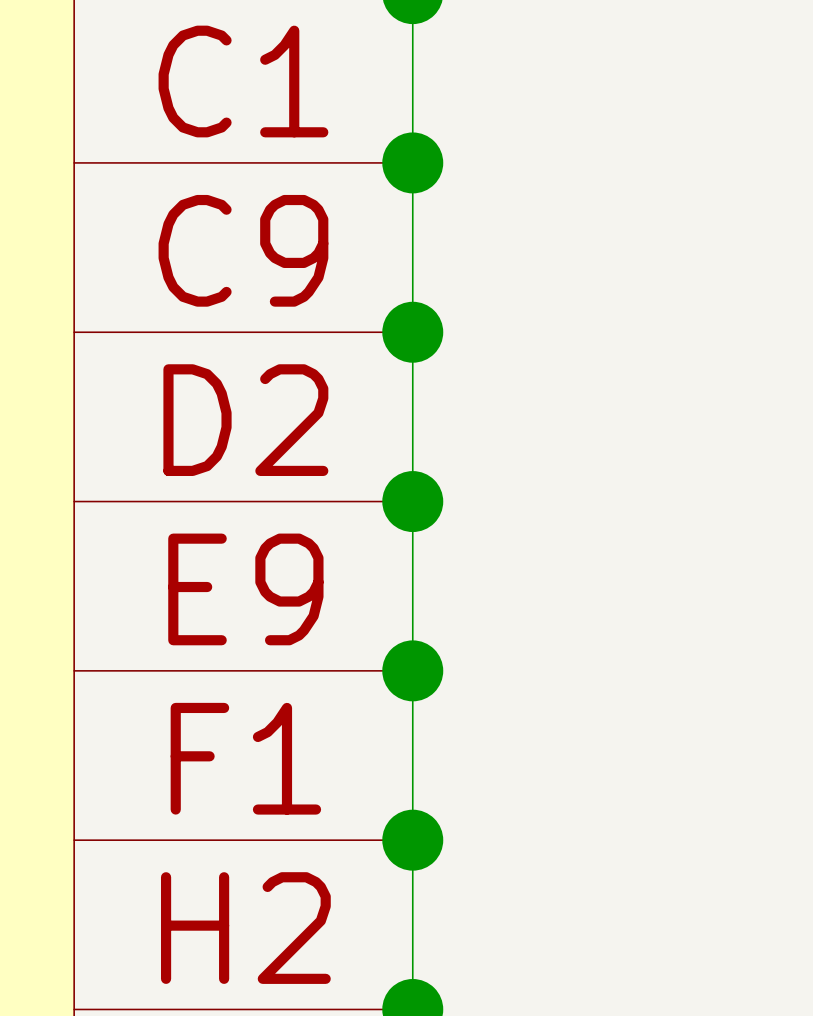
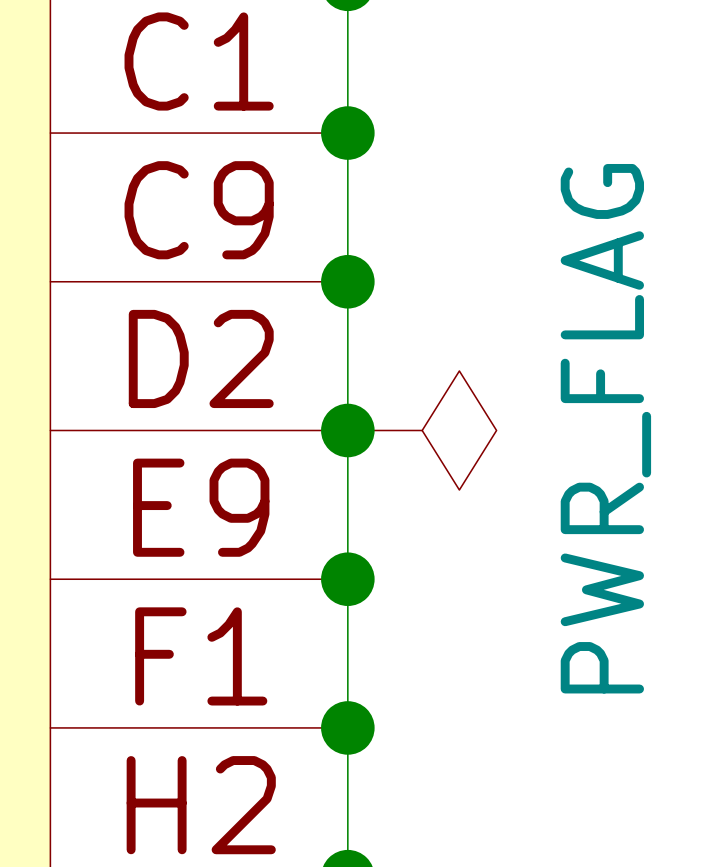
power symbol: none -> PWR_FLAG (422, 430)

